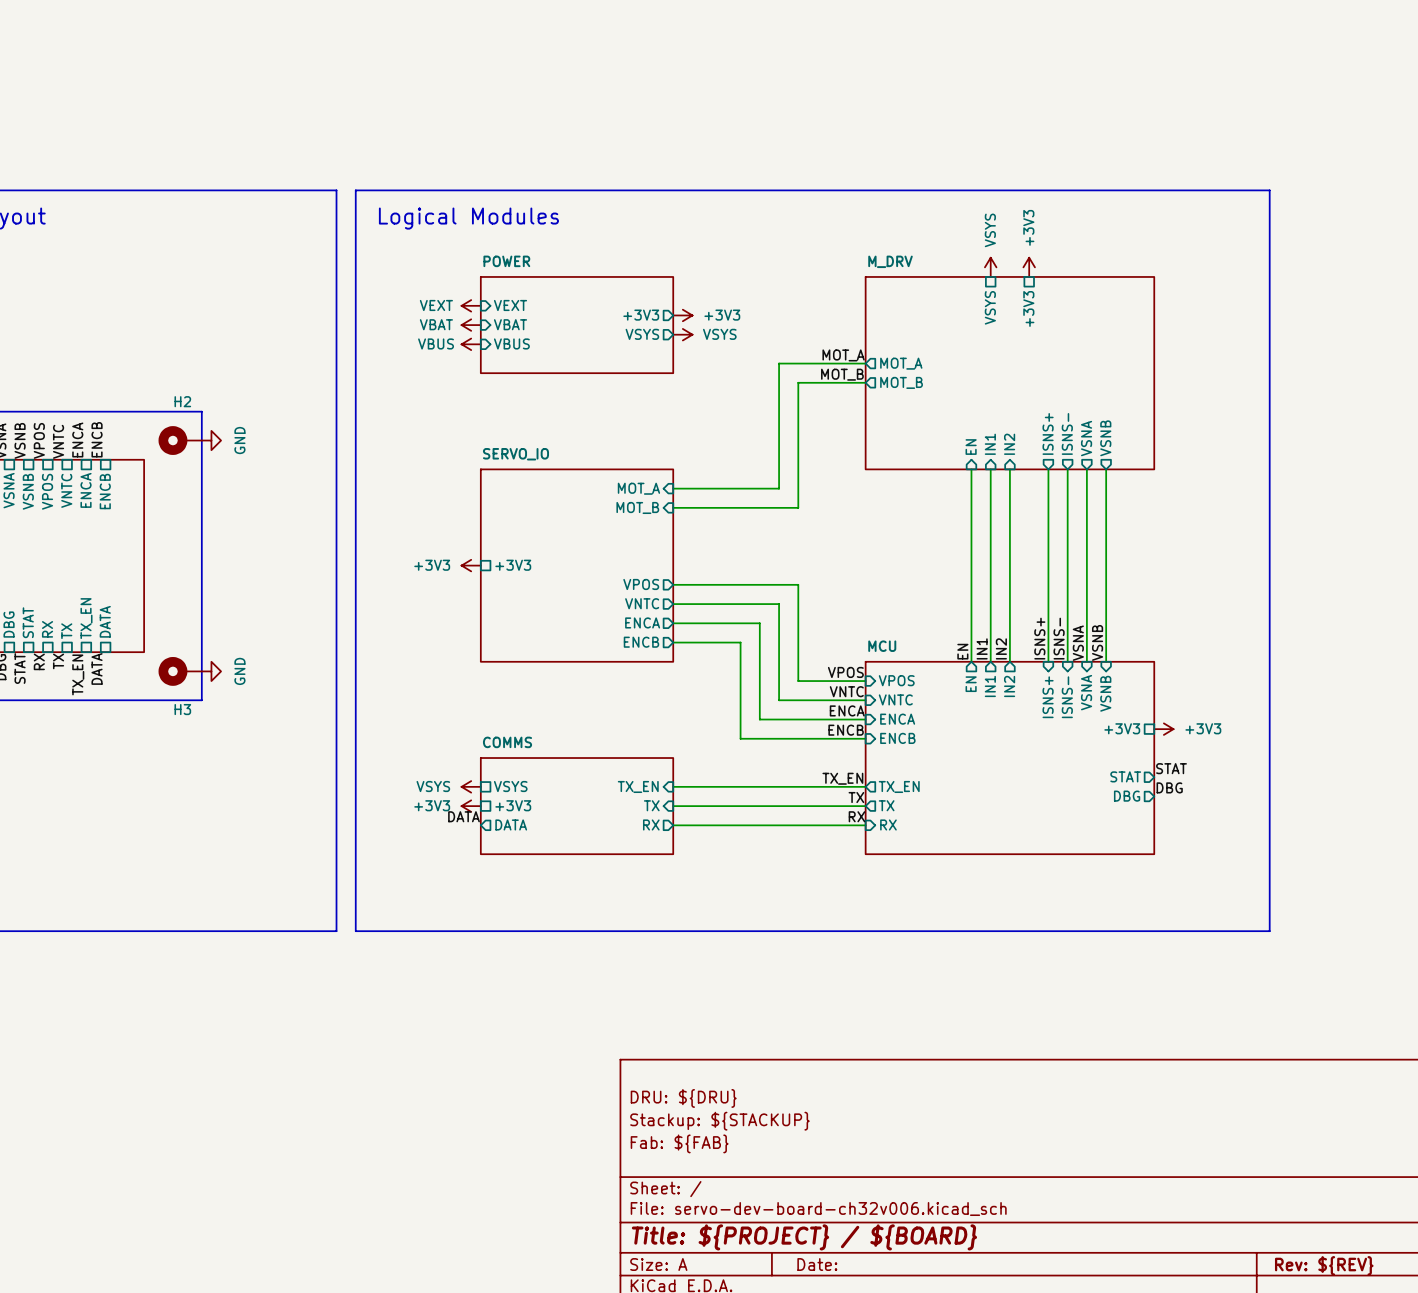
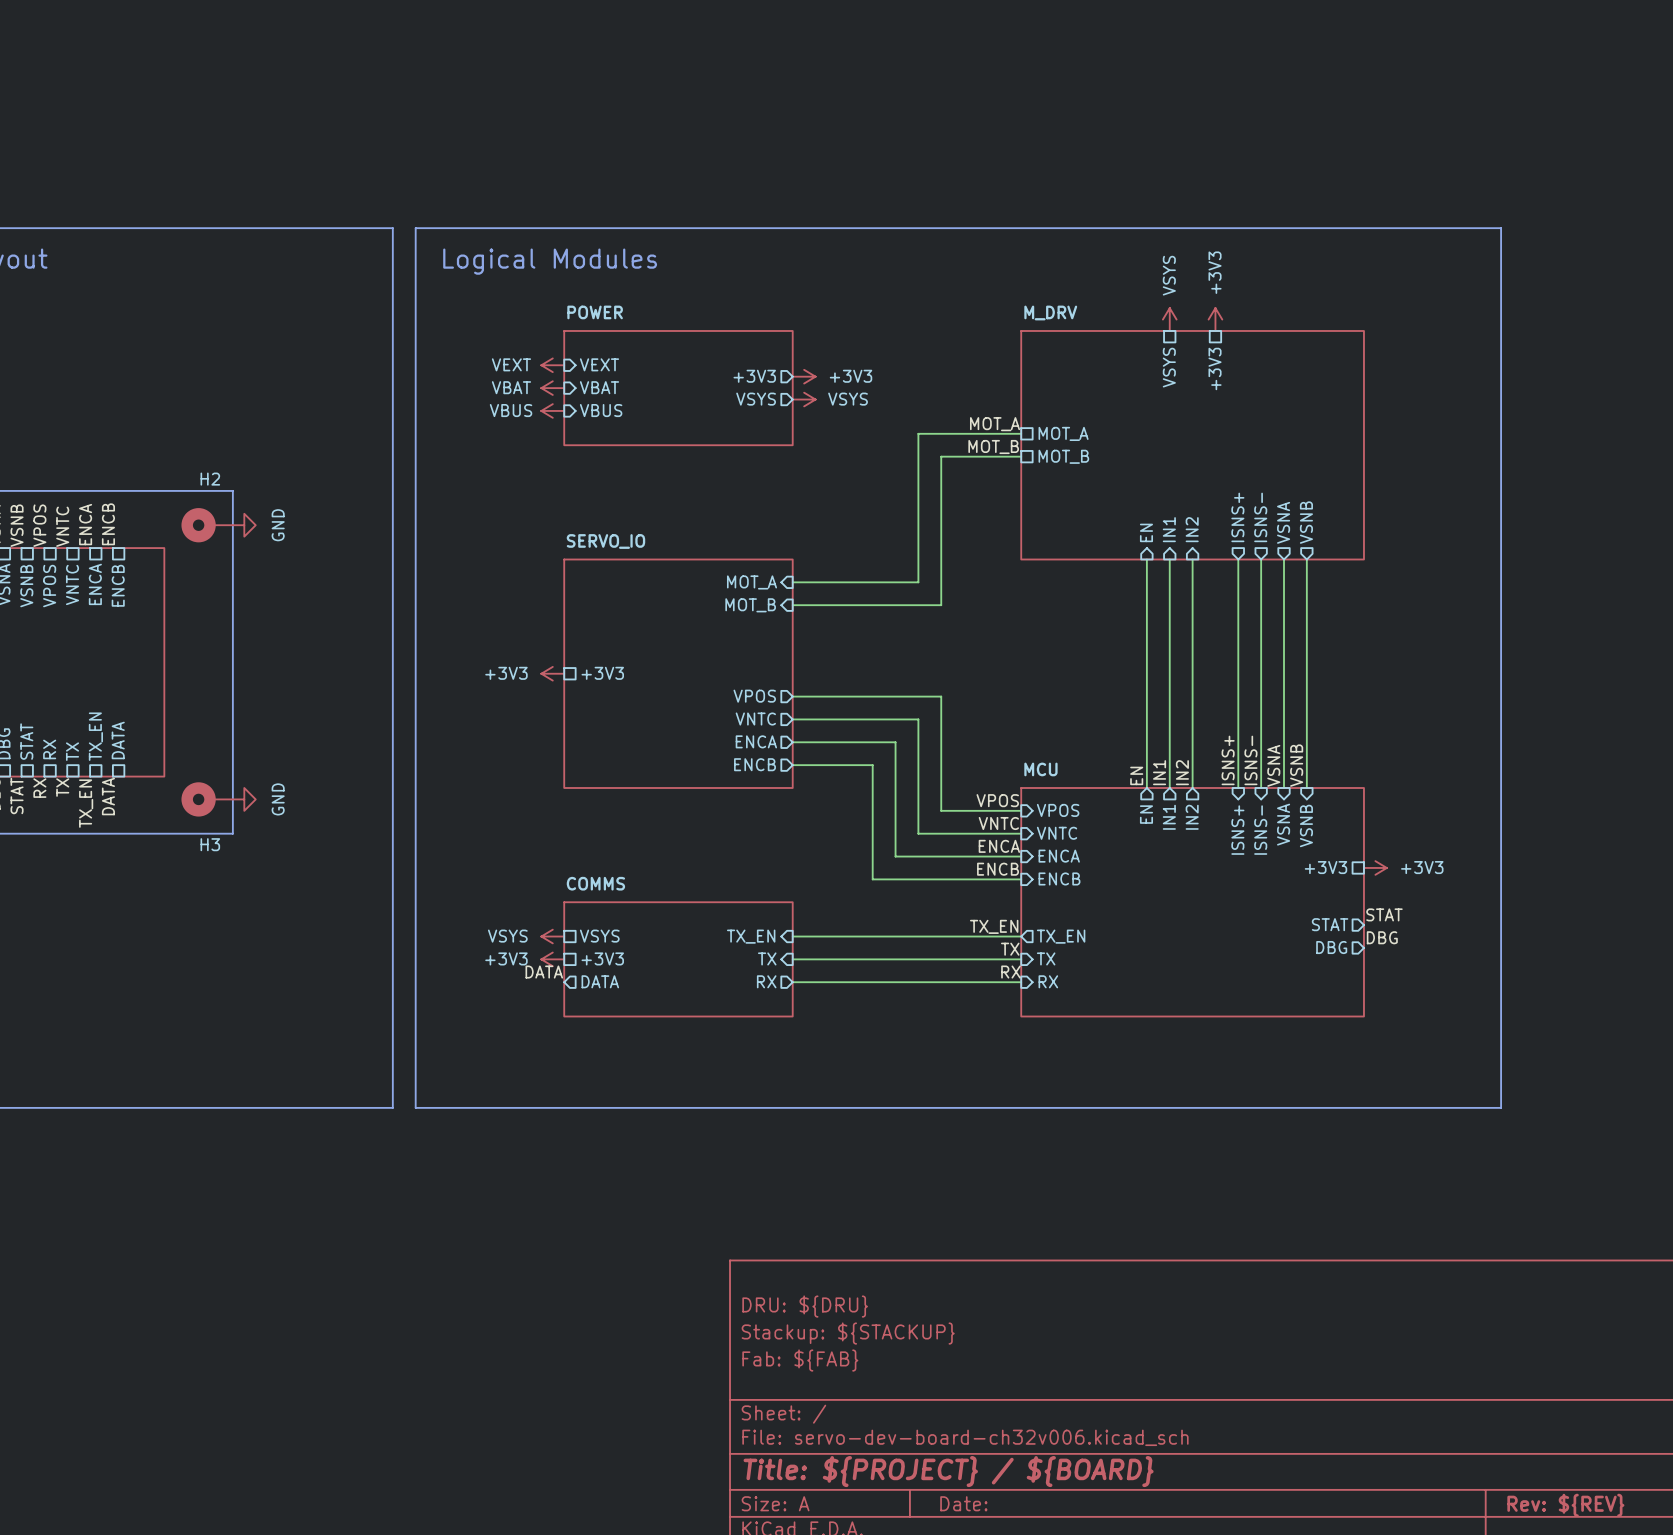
sheet pin shape: output (901, 363) -> passive (1063, 433)
sheet pin shape: output (901, 382) -> passive (1063, 456)
sheet pin shape: output (886, 805) -> input (1046, 958)

